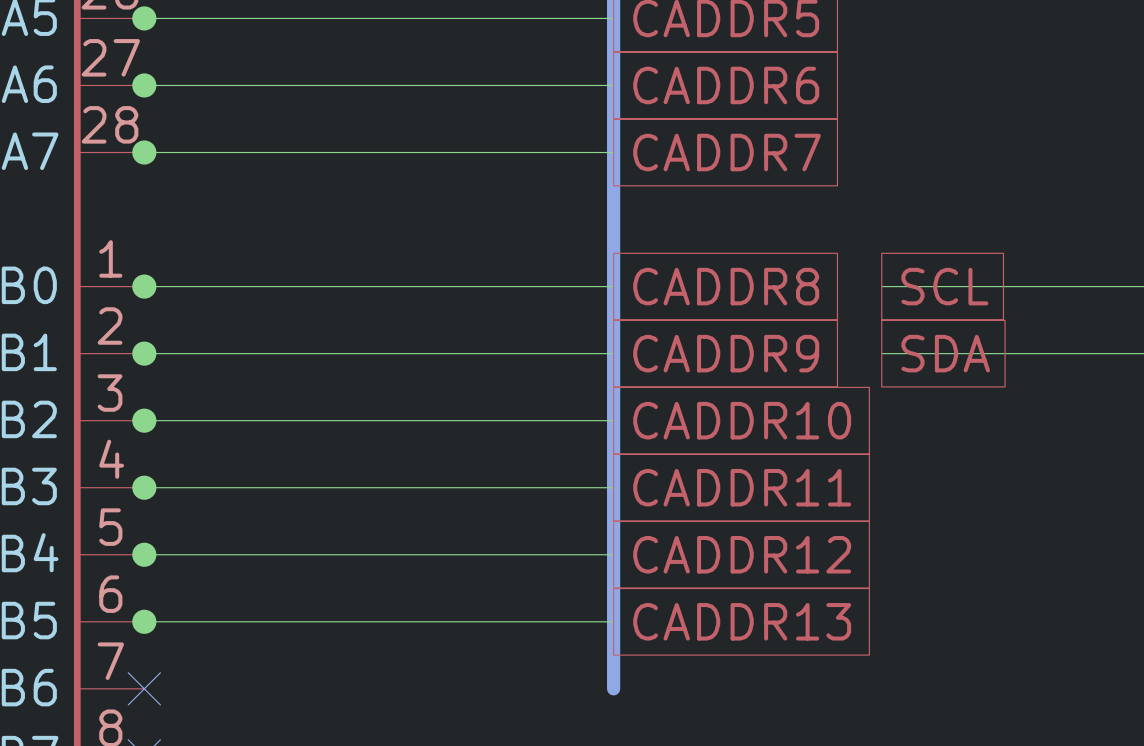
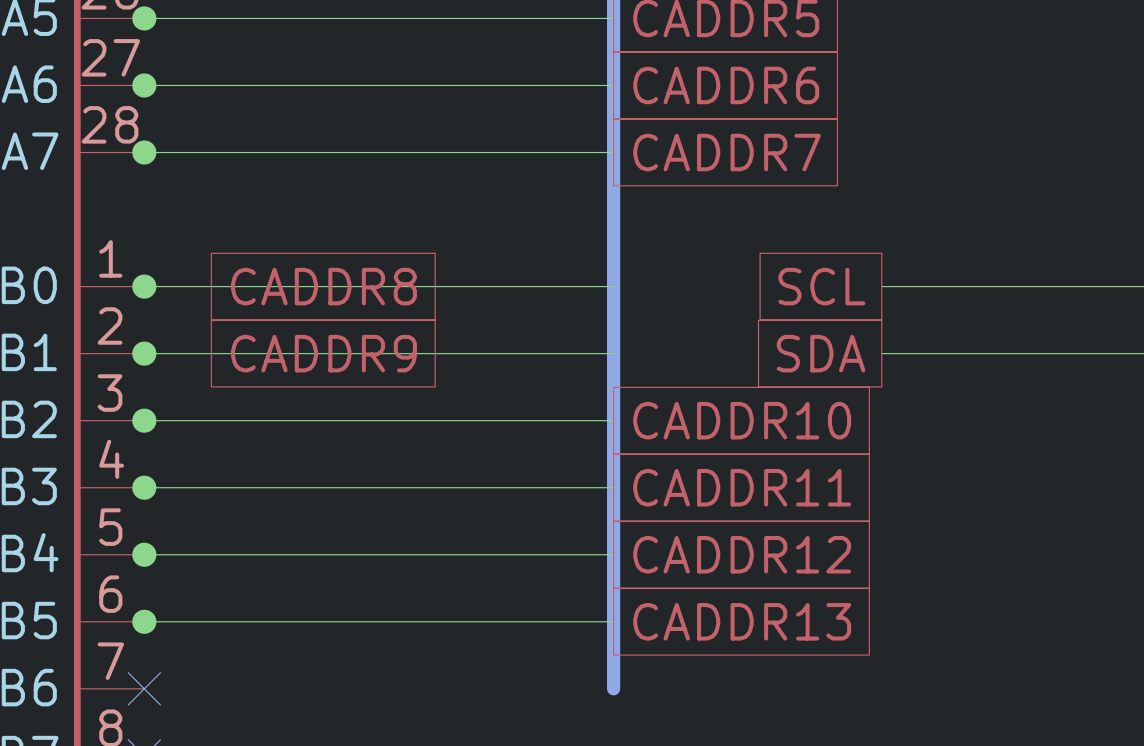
global label position: CADDR8 (726, 286) -> CADDR8 (323, 286)
global label rotation: 0° (944, 286) -> 180° (821, 286)
global label position: CADDR9 (726, 353) -> CADDR9 (323, 353)
global label rotation: 0° (945, 353) -> 180° (821, 353)

